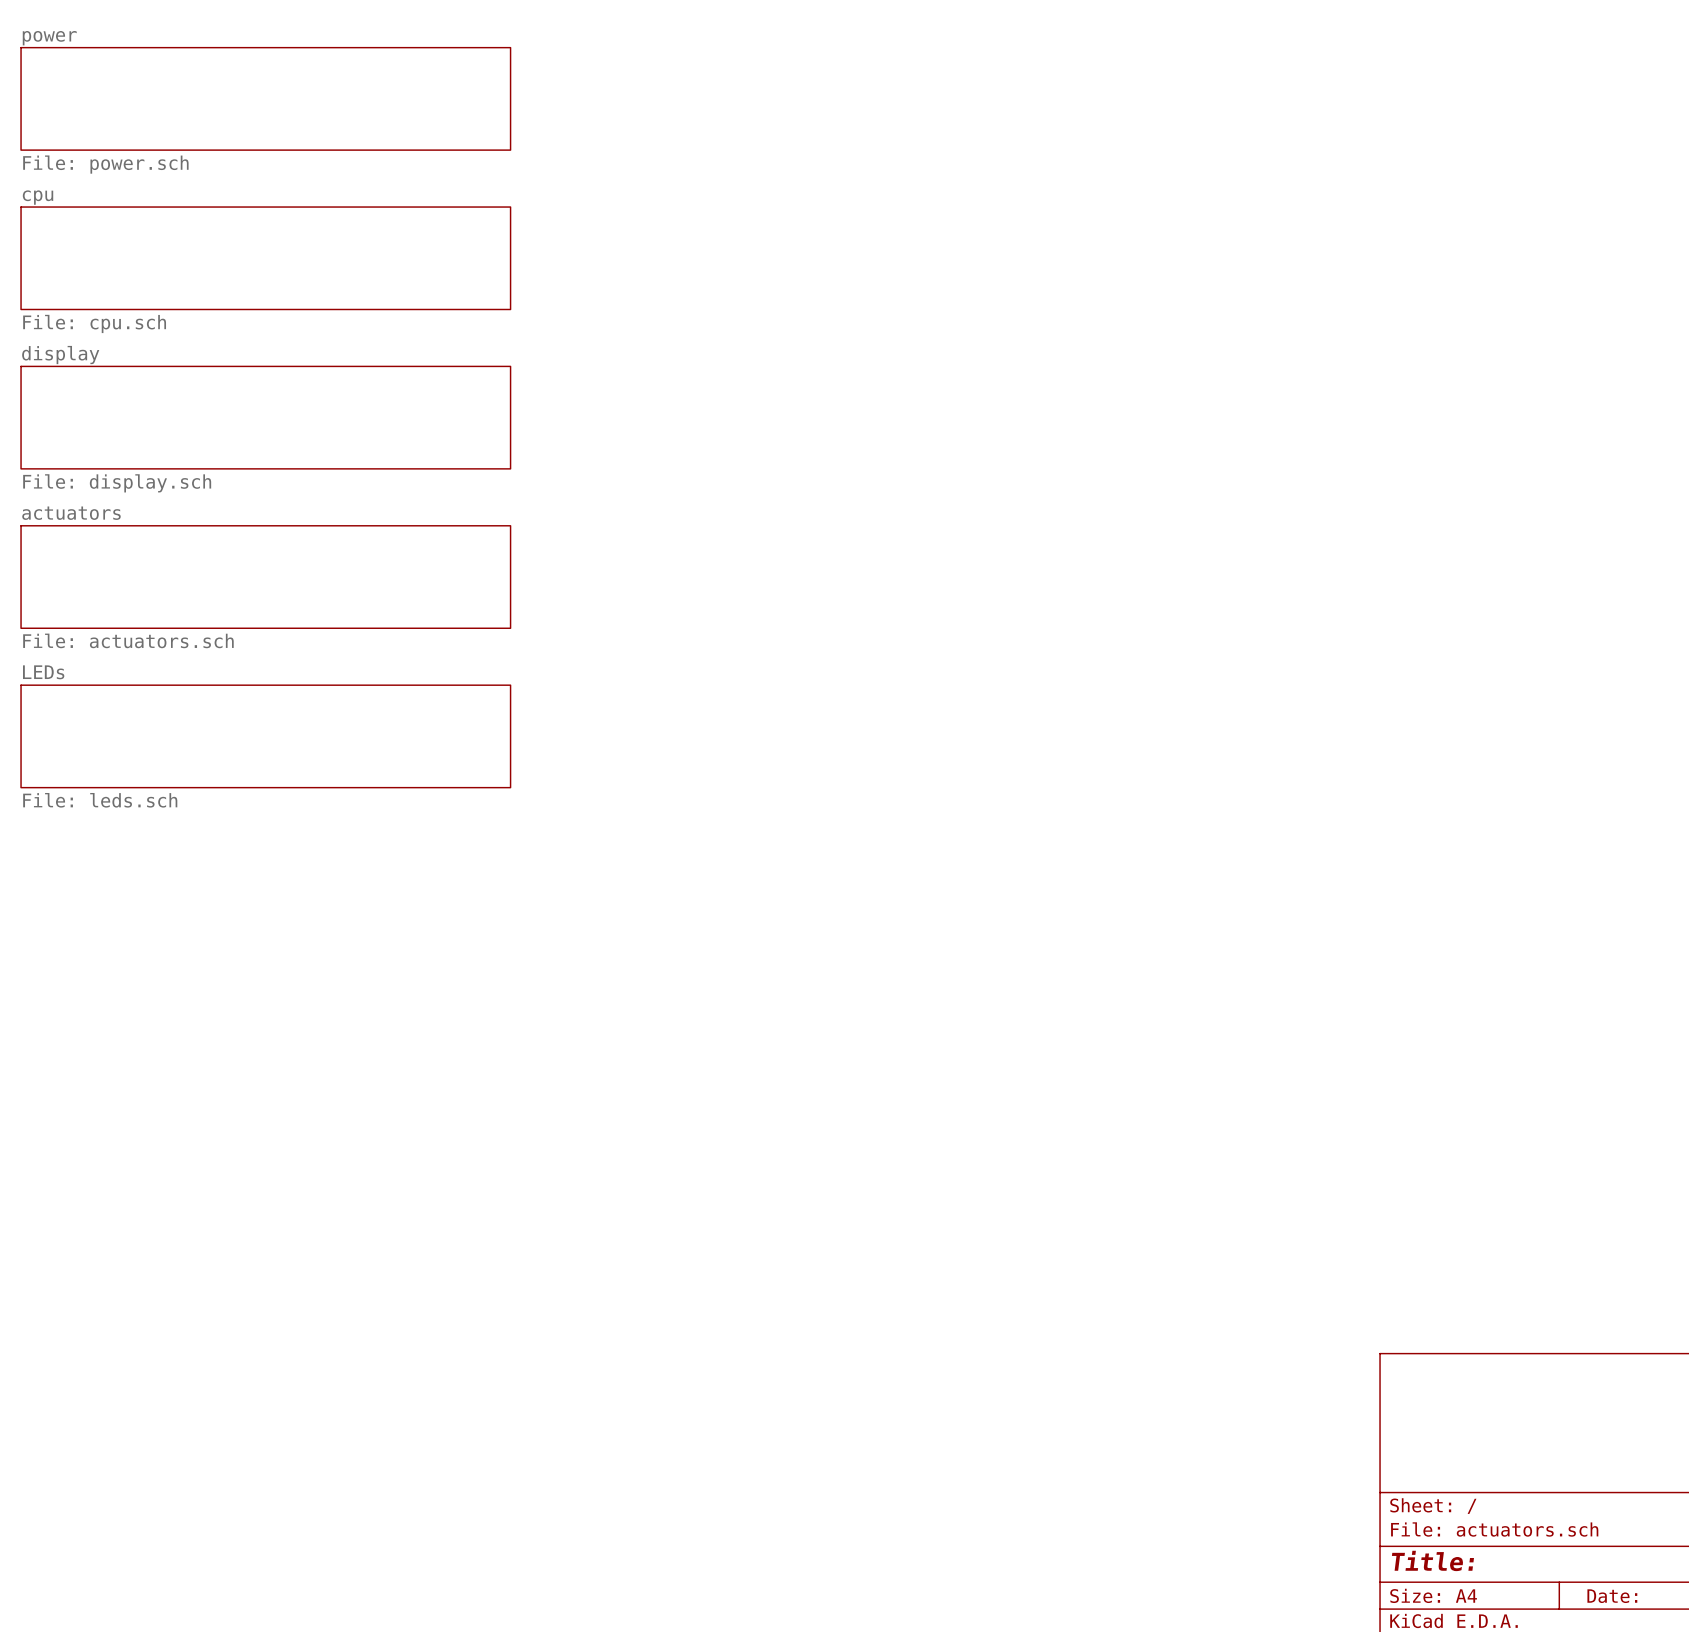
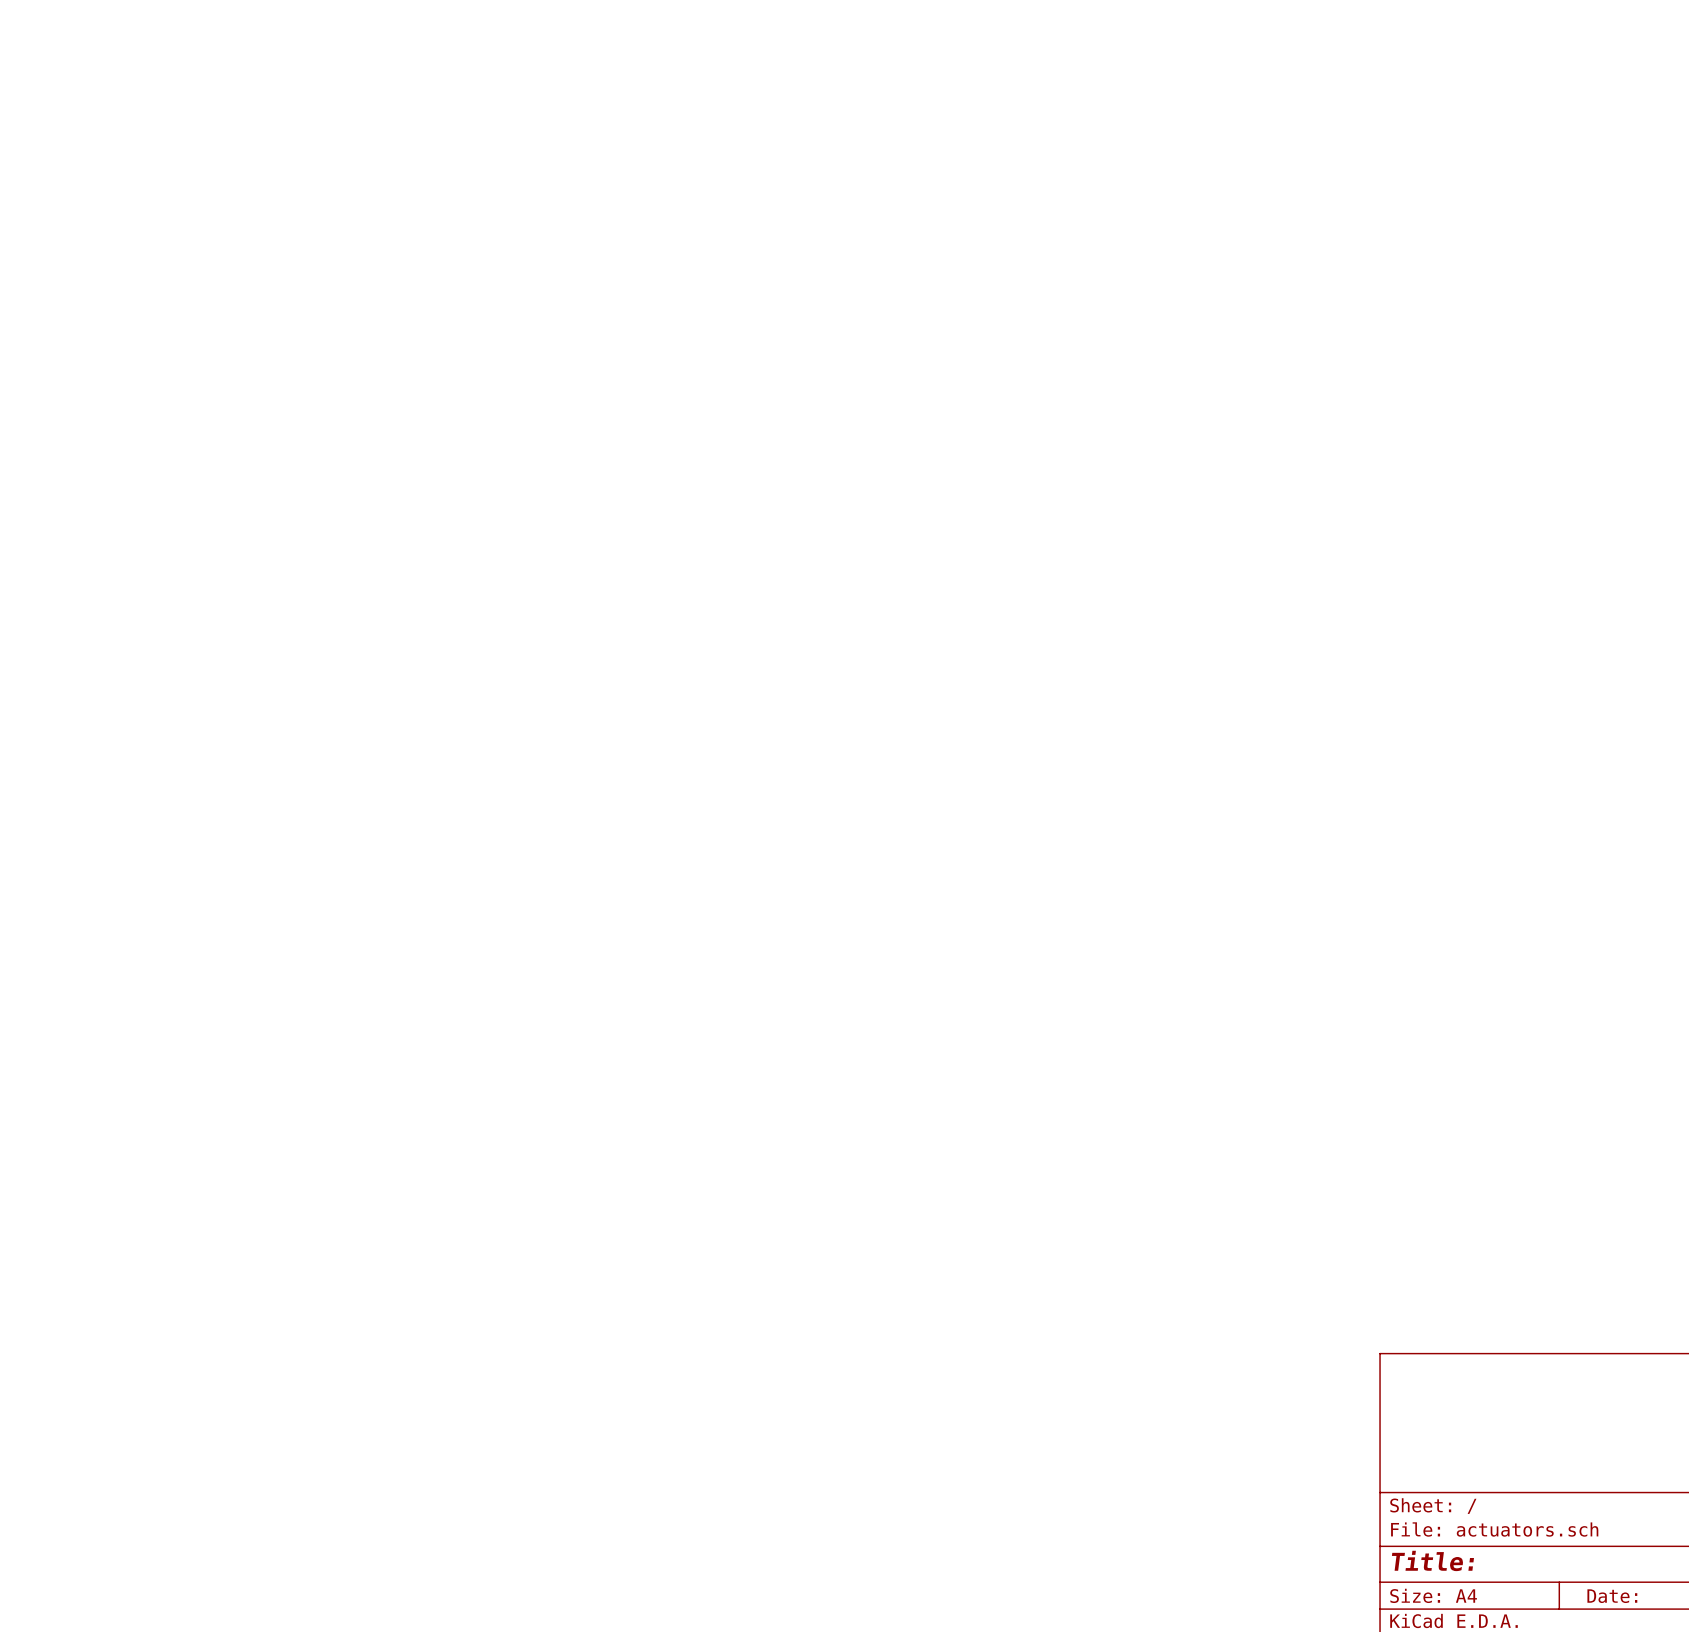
sheet power: File: power.sch (265, 98) -> none
sheet cpu: File: cpu.sch (265, 258) -> none
sheet display: File: display.sch (265, 417) -> none
sheet actuators: File: actuators.sch (265, 577) -> none
sheet LEDs: File: leds.sch (265, 736) -> none

